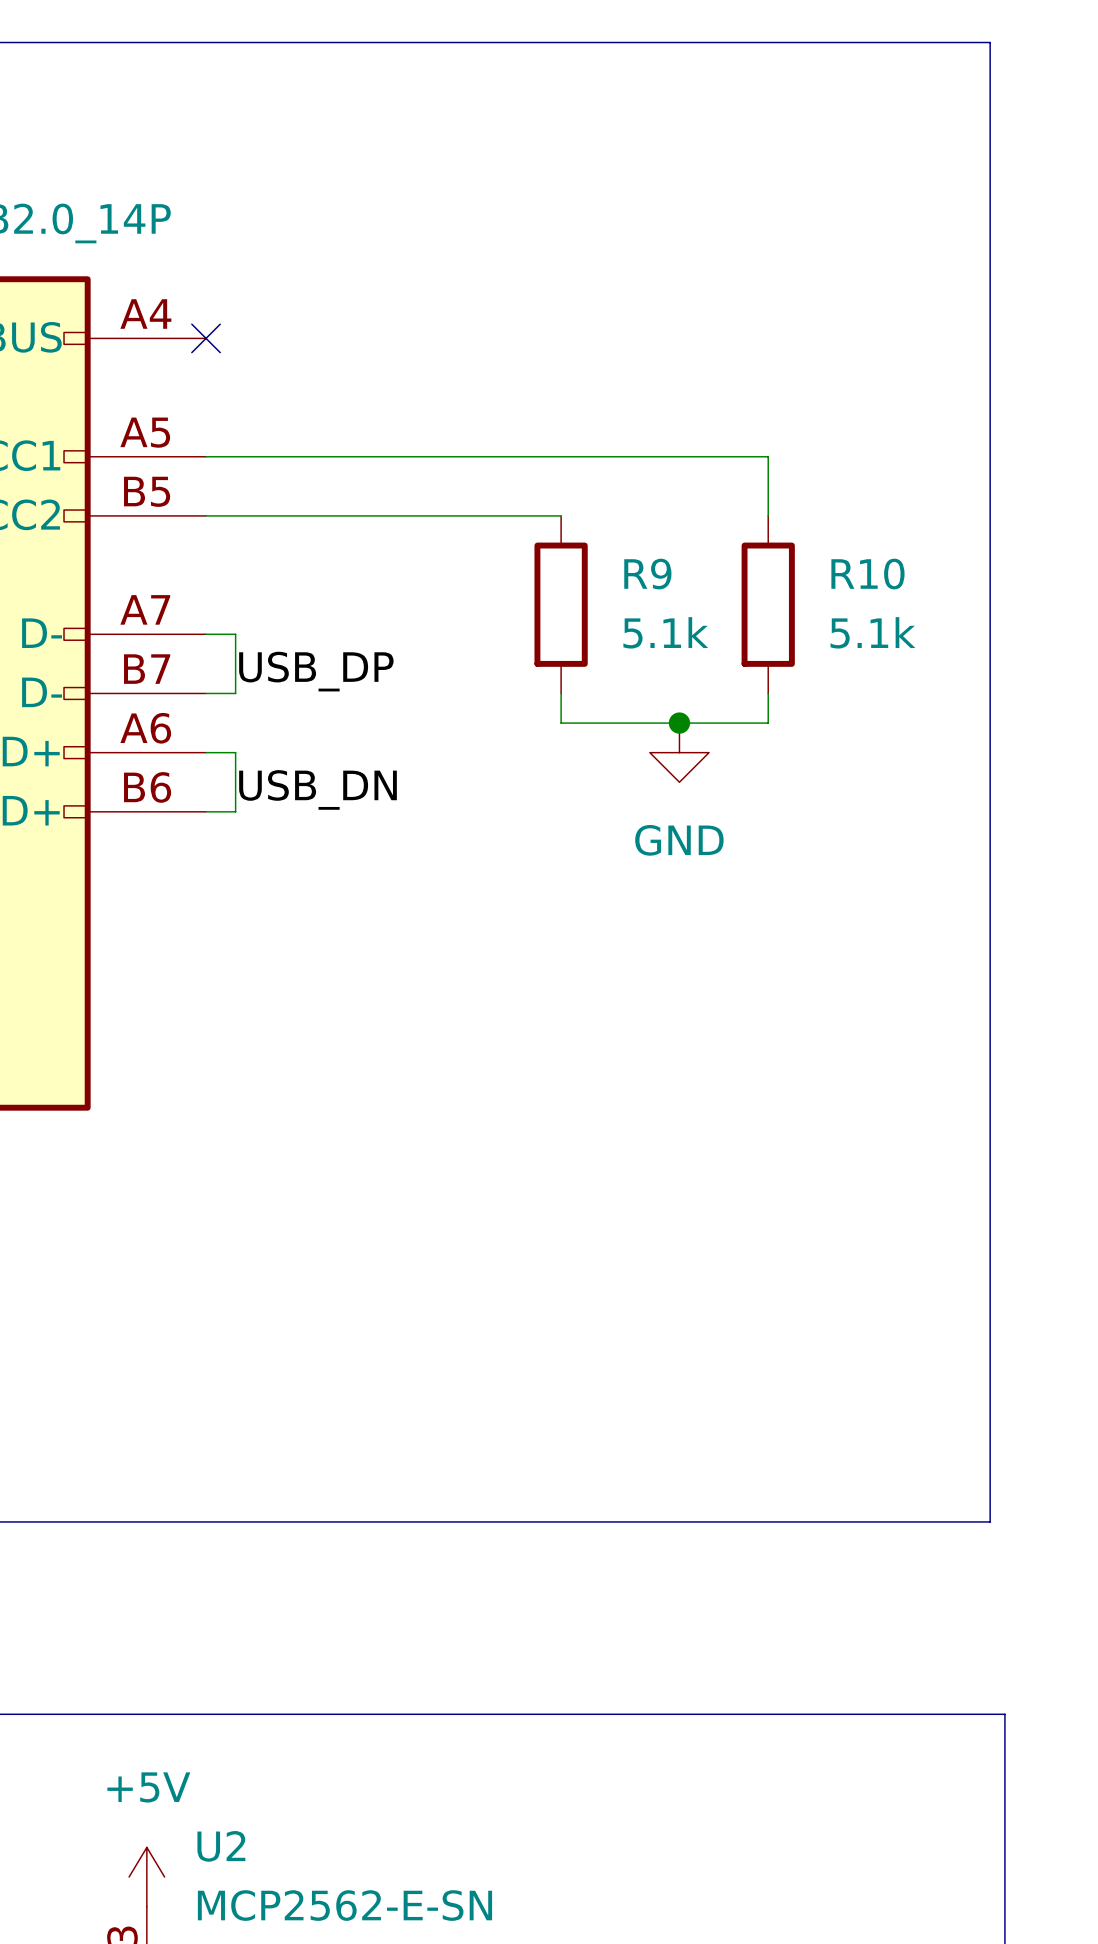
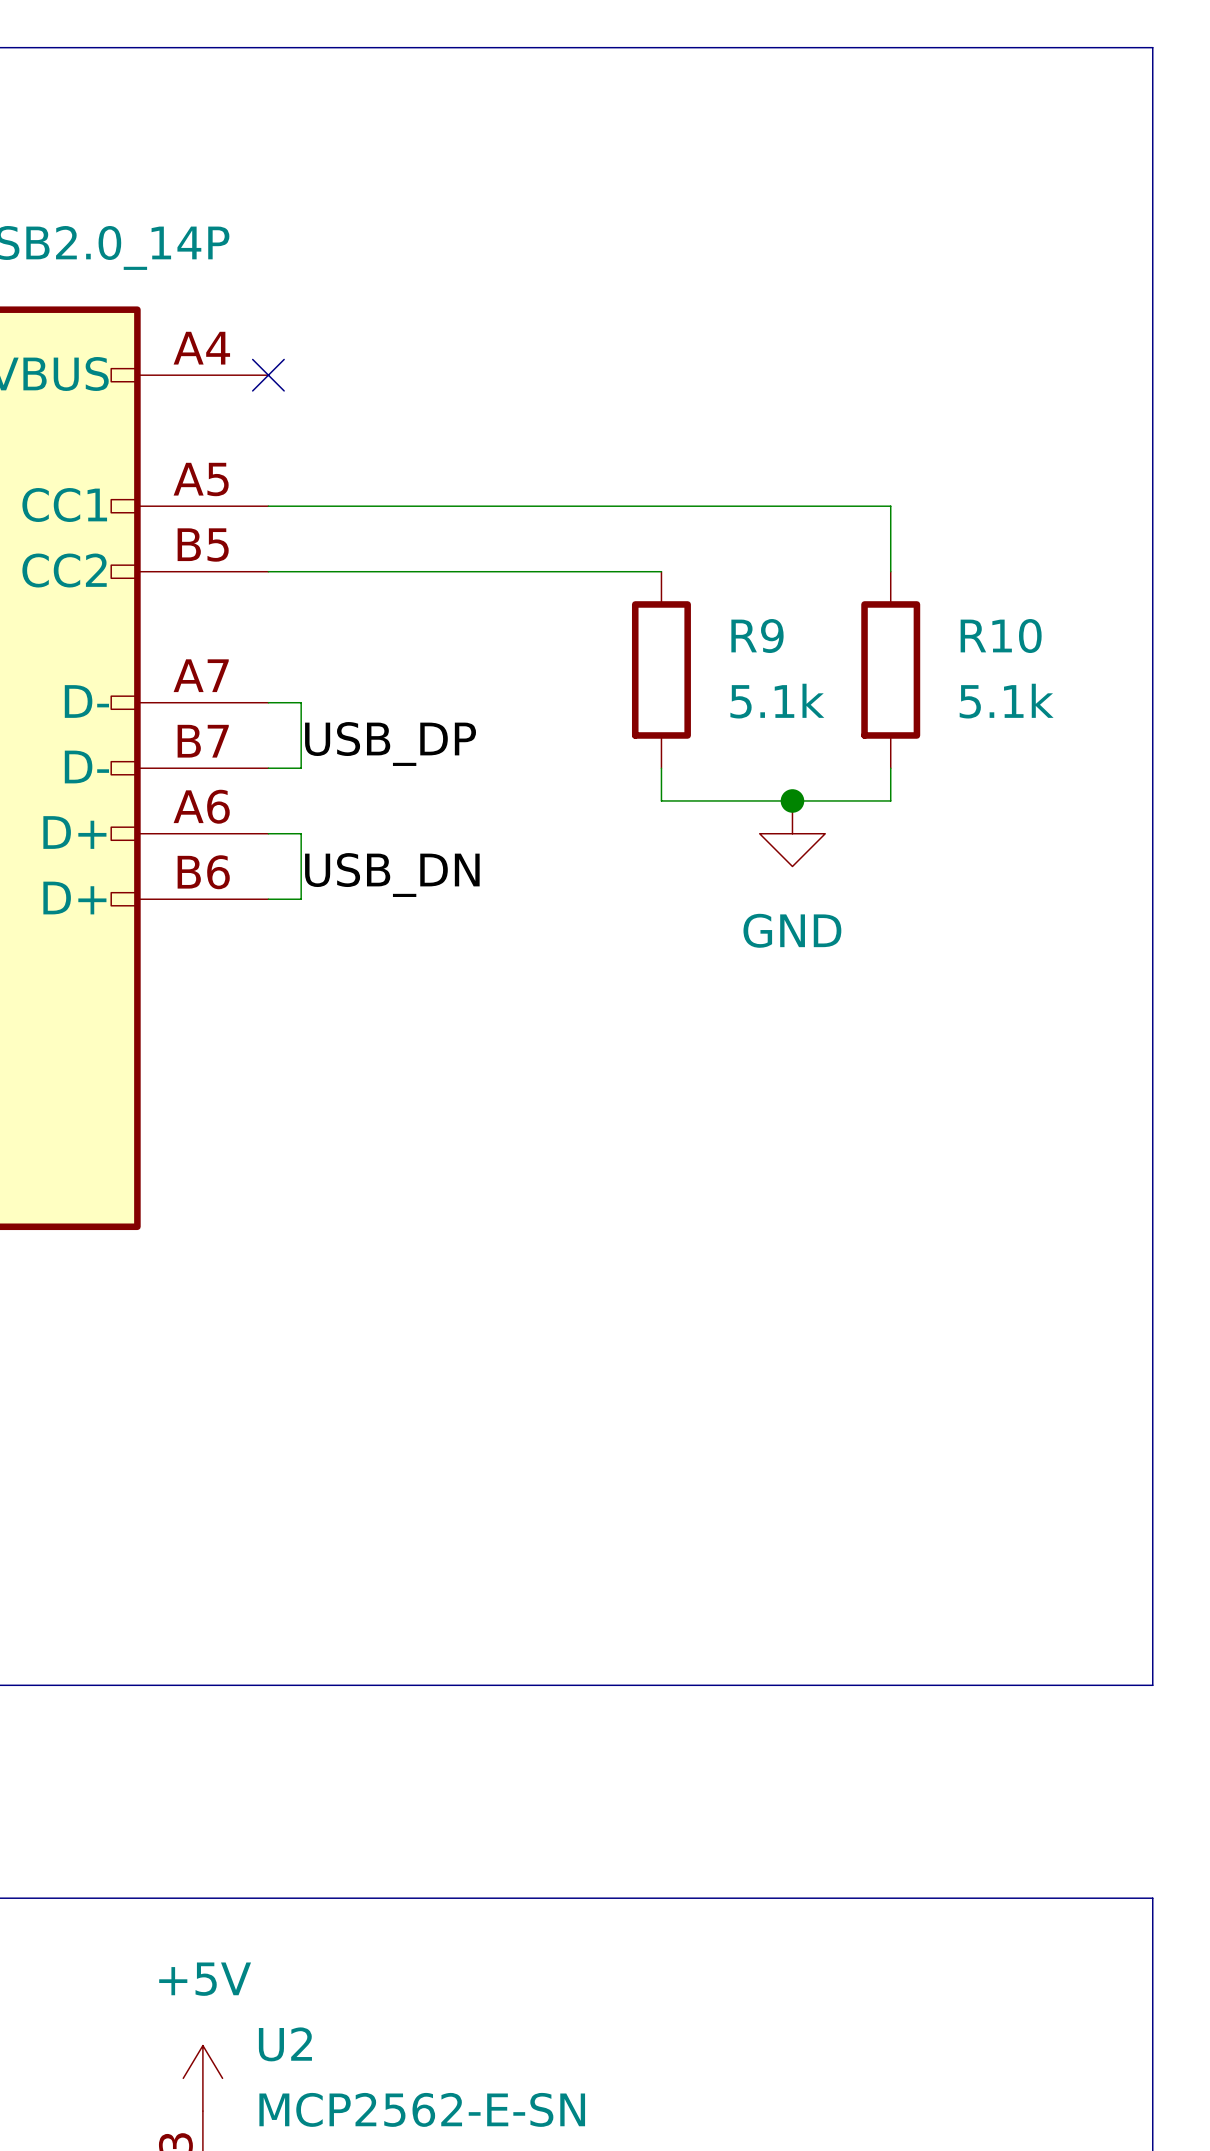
line: (990, 42) (990, 1521) -> (1136, 47) (1152, 47) (1152, 1685) (1136, 1685)

